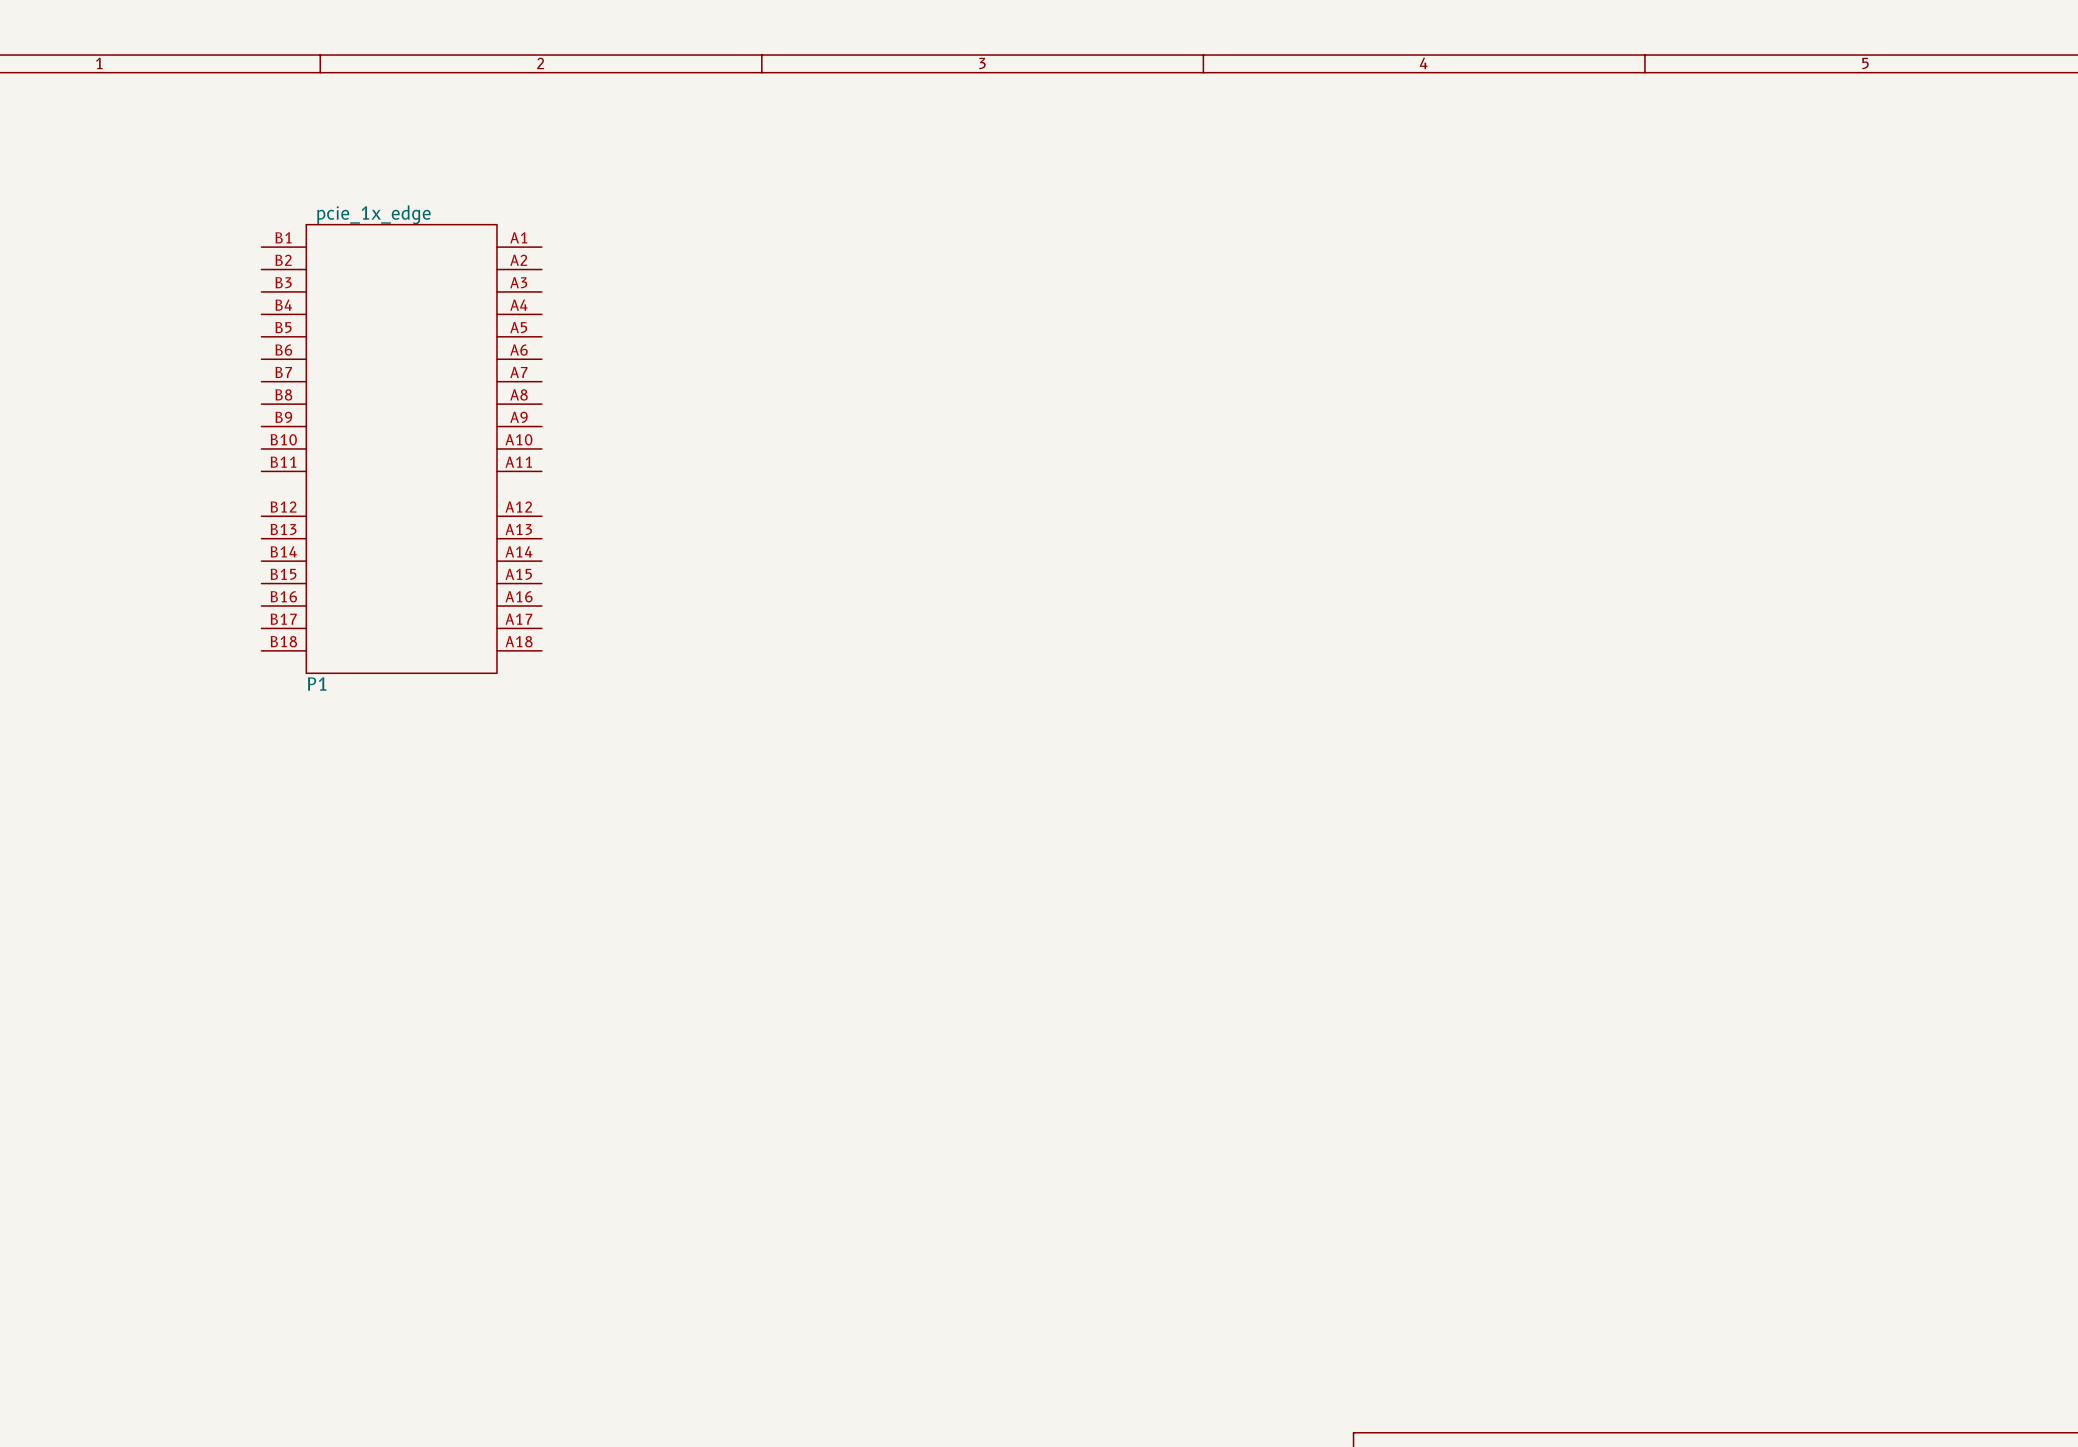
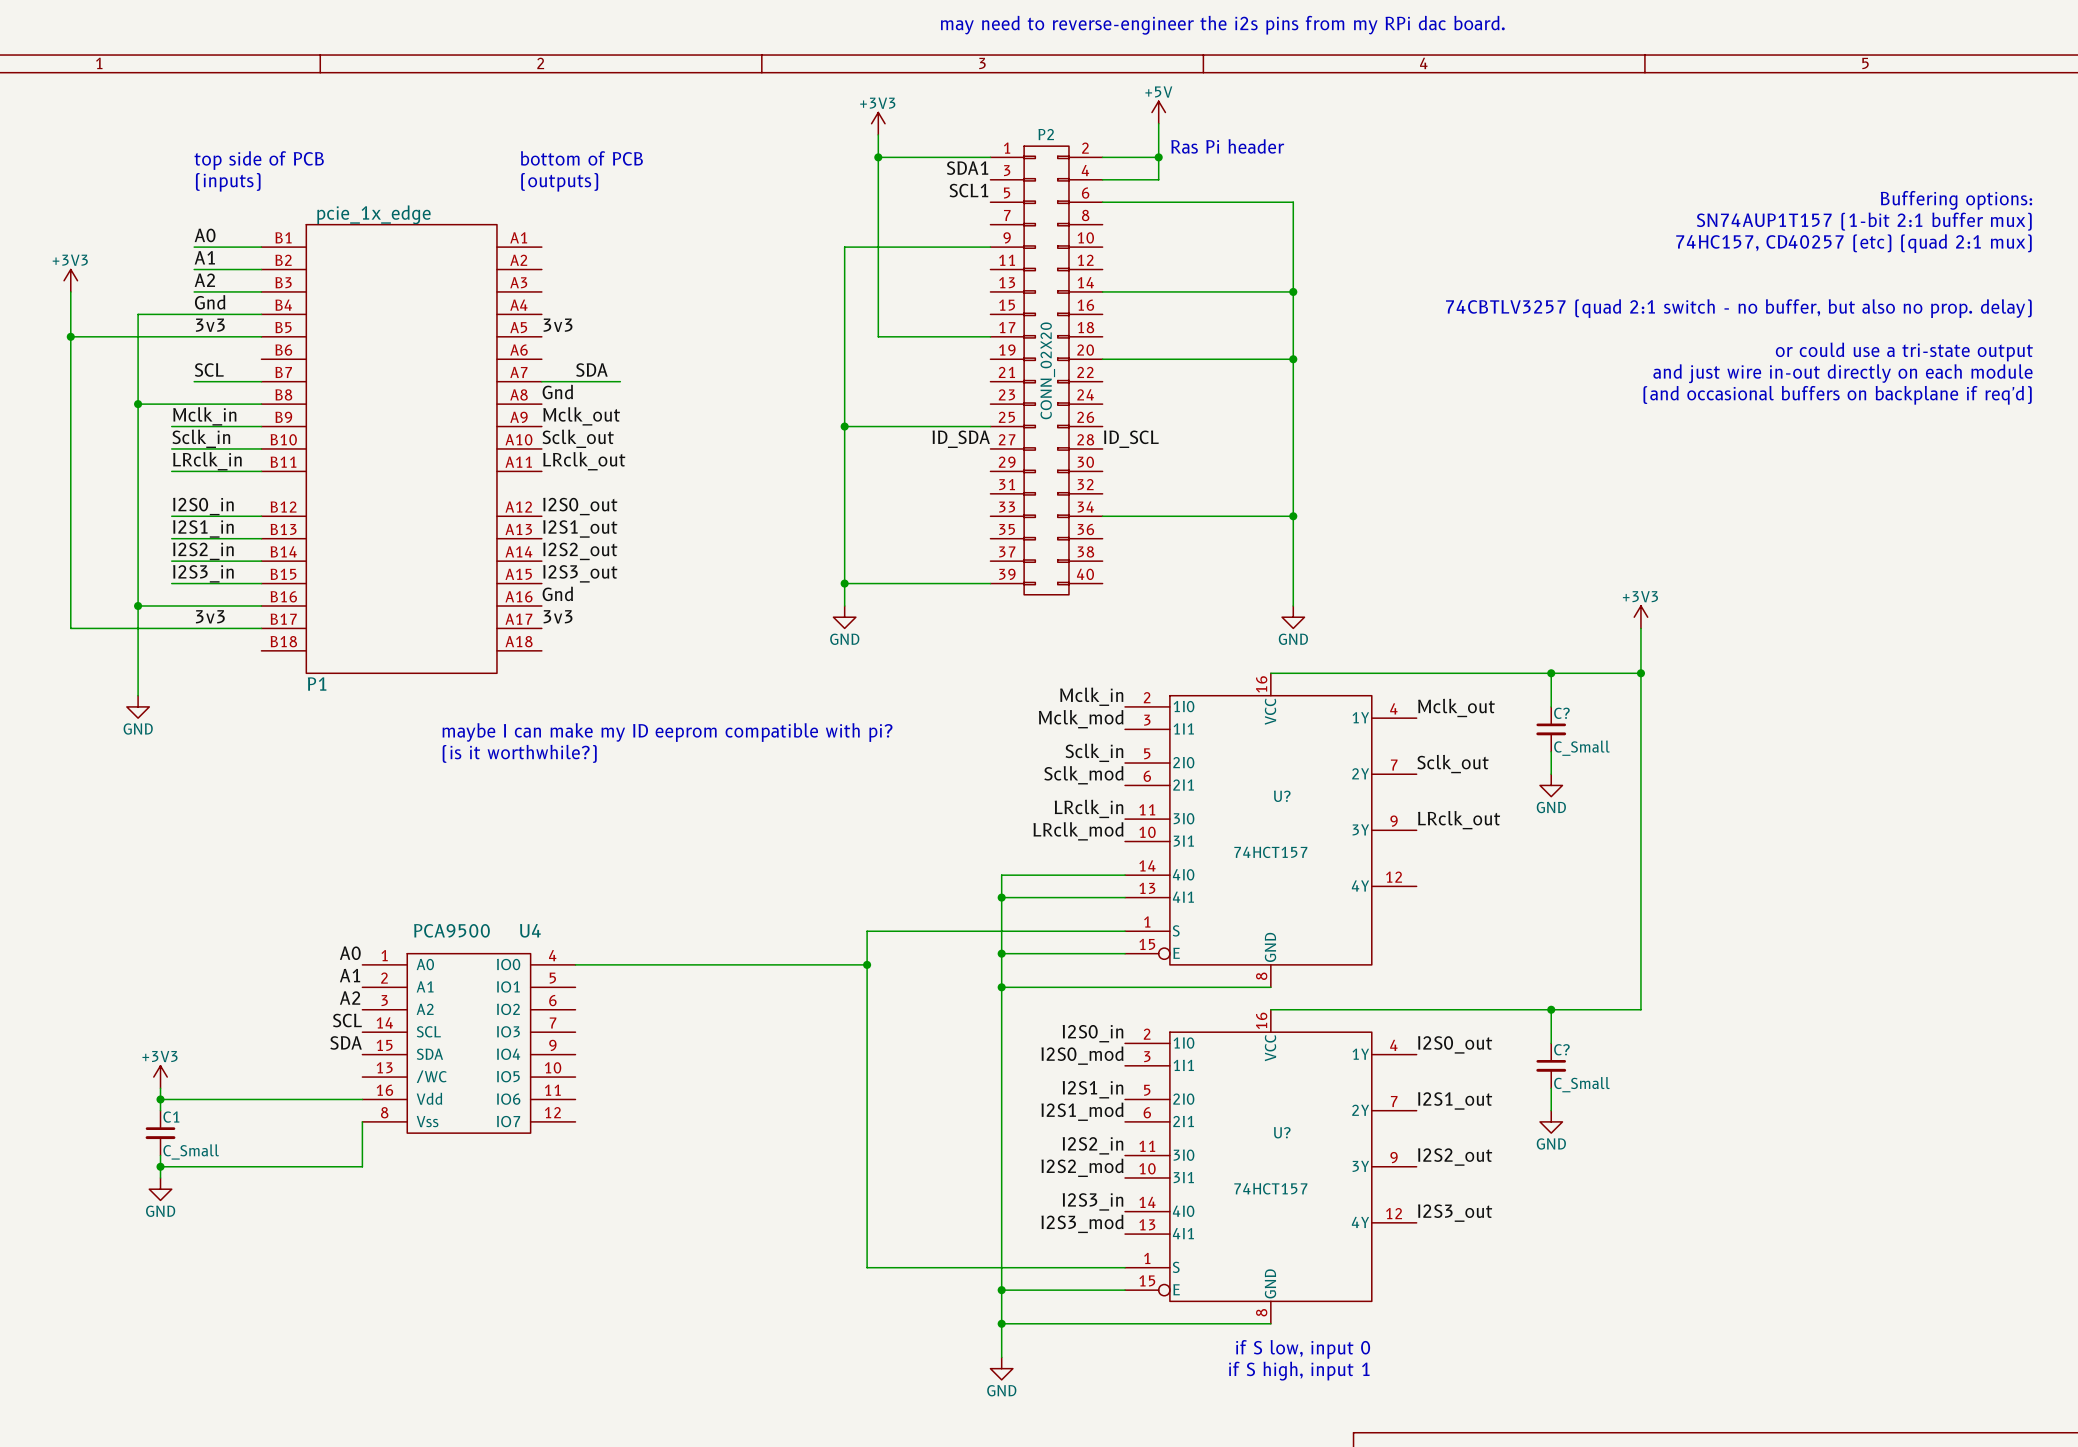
text: none -> may need to reverse-engineer the i2s pins from my RPi dac board. (1222, 25)
power symbol: none -> +5V (1158, 112)
power symbol: none -> +3V3 (878, 123)
wire: none -> (1158, 123) (1158, 179) (1102, 179)
wire: none -> (878, 134) (878, 336) (990, 336)
text: none -> Ras Pi header (1227, 146)
wire: none -> (878, 157) (990, 157)
junction: none -> (878, 157)
wire: none -> (1102, 157) (1158, 157)
junction: none -> (1158, 157)
text: none -> bottom of PCB (581, 158)
text: none -> top side of PCB (259, 160)
label: none -> SDA1 (967, 168)
text: none -> (inputs) (228, 182)
text: none -> (outputs) (559, 182)
label: none -> SCL1 (968, 190)
text: none -> Buffering options: (1956, 200)
wire: none -> (1102, 202) (1293, 202) (1293, 605)
text: none -> SN74AUP1T157 (1-bit 2:1 buffer mux) (1864, 221)
label: none -> A0 (205, 235)
text: none -> 74HC157, CD40257 (etc) (quad 2:1 mux) (1853, 243)
wire: none -> (194, 247) (261, 247)
wire: none -> (990, 247) (844, 247) (844, 605)
label: none -> A1 (204, 257)
wire: none -> (194, 269) (261, 269)
power symbol: none -> +3V3 (70, 280)
label: none -> A2 (204, 280)
wire: none -> (70, 291) (70, 628) (261, 628)
wire: none -> (194, 291) (261, 291)
wire: none -> (1102, 291) (1293, 291)
junction: none -> (1293, 291)
label: none -> Gnd (210, 302)
text: none -> 74CBTLV3257 (quad 2:1 switch - no buffer, but also no prop. delay) (1738, 308)
wire: none -> (261, 314) (138, 314) (138, 695)
label: none -> 3v3 (210, 325)
label: none -> 3v3 (558, 325)
wire: none -> (70, 336) (261, 336)
junction: none -> (70, 336)
text: none -> or could use a tri-state output (1904, 351)
wire: none -> (1102, 359) (1293, 359)
junction: none -> (1293, 359)
label: none -> SCL (209, 370)
label: none -> SDA (591, 370)
P2: none -> CONN_02X20 (1046, 370)
text: none -> and just wire in-out directly on each module (1842, 373)
wire: none -> (194, 381) (261, 381)
wire: none -> (541, 381) (620, 381)
label: none -> Gnd (557, 392)
text: none -> (and occasional buffers on backplane if req'd) (1837, 395)
wire: none -> (138, 404) (261, 404)
junction: none -> (138, 404)
label: none -> Mclk_in (204, 416)
label: none -> Mclk_out (581, 416)
wire: none -> (171, 426) (261, 426)
wire: none -> (844, 426) (990, 426)
junction: none -> (844, 426)
label: none -> Sclk_in (201, 438)
label: none -> Sclk_out (578, 438)
label: none -> ID_SDA (961, 439)
label: none -> ID_SCL (1131, 439)
wire: none -> (171, 448) (261, 448)
label: none -> LRclk_in (207, 461)
label: none -> LRclk_out (584, 461)
wire: none -> (171, 471) (261, 471)
label: none -> I2S0_in (203, 506)
label: none -> I2S0_out (580, 506)
wire: none -> (171, 516) (261, 516)
wire: none -> (1102, 516) (1293, 516)
junction: none -> (1293, 516)
label: none -> I2S1_in (203, 528)
label: none -> I2S1_out (580, 528)
wire: none -> (171, 538) (261, 538)
label: none -> I2S2_in (203, 551)
label: none -> I2S2_out (580, 551)
wire: none -> (171, 561) (261, 561)
label: none -> I2S3_in (203, 573)
label: none -> I2S3_out (580, 573)
wire: none -> (171, 583) (261, 583)
wire: none -> (844, 583) (990, 583)
junction: none -> (844, 583)
label: none -> Gnd (557, 593)
wire: none -> (138, 605) (261, 605)
junction: none -> (138, 605)
label: none -> 3v3 (210, 616)
label: none -> 3v3 (558, 616)
power symbol: none -> GND (844, 617)
power symbol: none -> GND (1293, 617)
power symbol: none -> +3V3 (1640, 617)
wire: none -> (1640, 628) (1640, 1009) (1270, 1009)
wire: none -> (1270, 673) (1640, 673)
wire: none -> (1551, 673) (1551, 706)
junction: none -> (1551, 673)
junction: none -> (1640, 673)
label: none -> Mclk_in (1091, 696)
power symbol: none -> GND (138, 706)
label: none -> Mclk_out (1456, 707)
label: none -> Mclk_mod (1081, 719)
C?: none -> C_Small (1551, 729)
text: none -> maybe I can make my ID eeprom compatible with pi? (667, 732)
wire: none -> (1551, 751) (1551, 774)
label: none -> Sclk_in (1094, 752)
text: none -> (is it worthwhile?) (519, 753)
label: none -> Sclk_out (1452, 764)
label: none -> Sclk_mod (1083, 775)
power symbol: none -> GND (1551, 785)
label: none -> LRclk_in (1089, 808)
label: none -> LRclk_out (1459, 820)
U?: none -> 74HCT157 (1270, 830)
label: none -> LRclk_mod (1078, 831)
wire: none -> (1125, 875) (1001, 875) (1001, 1357)
wire: none -> (1001, 897) (1125, 897)
junction: none -> (1001, 897)
wire: none -> (1125, 931) (867, 931) (867, 1267) (1125, 1267)
label: none -> A0 (350, 953)
wire: none -> (1001, 953) (1125, 953)
junction: none -> (1001, 953)
wire: none -> (575, 964) (867, 964)
junction: none -> (867, 964)
label: none -> A1 (350, 975)
wire: none -> (1001, 987) (1270, 987)
junction: none -> (1001, 987)
label: none -> A2 (350, 998)
wire: none -> (1551, 1009) (1551, 1043)
junction: none -> (1551, 1009)
label: none -> SCL (347, 1020)
label: none -> I2S0_in (1092, 1033)
label: none -> SDA (346, 1042)
U4: none -> PCA9500 (468, 1043)
label: none -> I2S0_out (1455, 1044)
label: none -> I2S0_mod (1082, 1055)
C?: none -> C_Small (1551, 1065)
power symbol: none -> +3V3 (160, 1077)
wire: none -> (160, 1088) (160, 1110)
wire: none -> (1551, 1088) (1551, 1110)
label: none -> I2S1_in (1092, 1089)
wire: none -> (160, 1099) (362, 1099)
junction: none -> (160, 1099)
label: none -> I2S1_out (1455, 1100)
label: none -> I2S1_mod (1082, 1111)
wire: none -> (362, 1121) (362, 1166) (160, 1166)
power symbol: none -> GND (1551, 1121)
C1: none -> C_Small (160, 1133)
label: none -> I2S2_in (1092, 1145)
wire: none -> (160, 1155) (160, 1177)
label: none -> I2S2_out (1455, 1157)
junction: none -> (160, 1166)
U?: none -> 74HCT157 (1270, 1166)
label: none -> I2S2_mod (1082, 1167)
power symbol: none -> GND (160, 1189)
label: none -> I2S3_in (1092, 1201)
label: none -> I2S3_out (1455, 1213)
label: none -> I2S3_mod (1082, 1223)
wire: none -> (1001, 1290) (1125, 1290)
junction: none -> (1001, 1290)
wire: none -> (1001, 1323) (1270, 1323)
junction: none -> (1001, 1323)
text: none -> if S low, input 0 (1303, 1349)
power symbol: none -> GND (1001, 1368)
text: none -> if S high, input 1 (1299, 1371)

